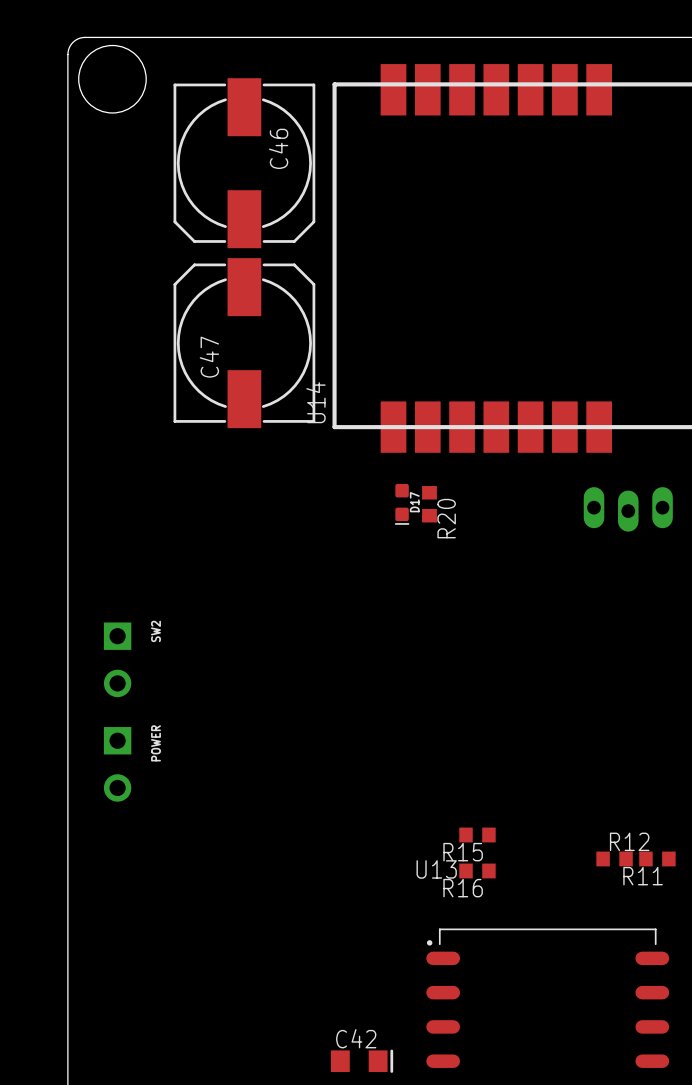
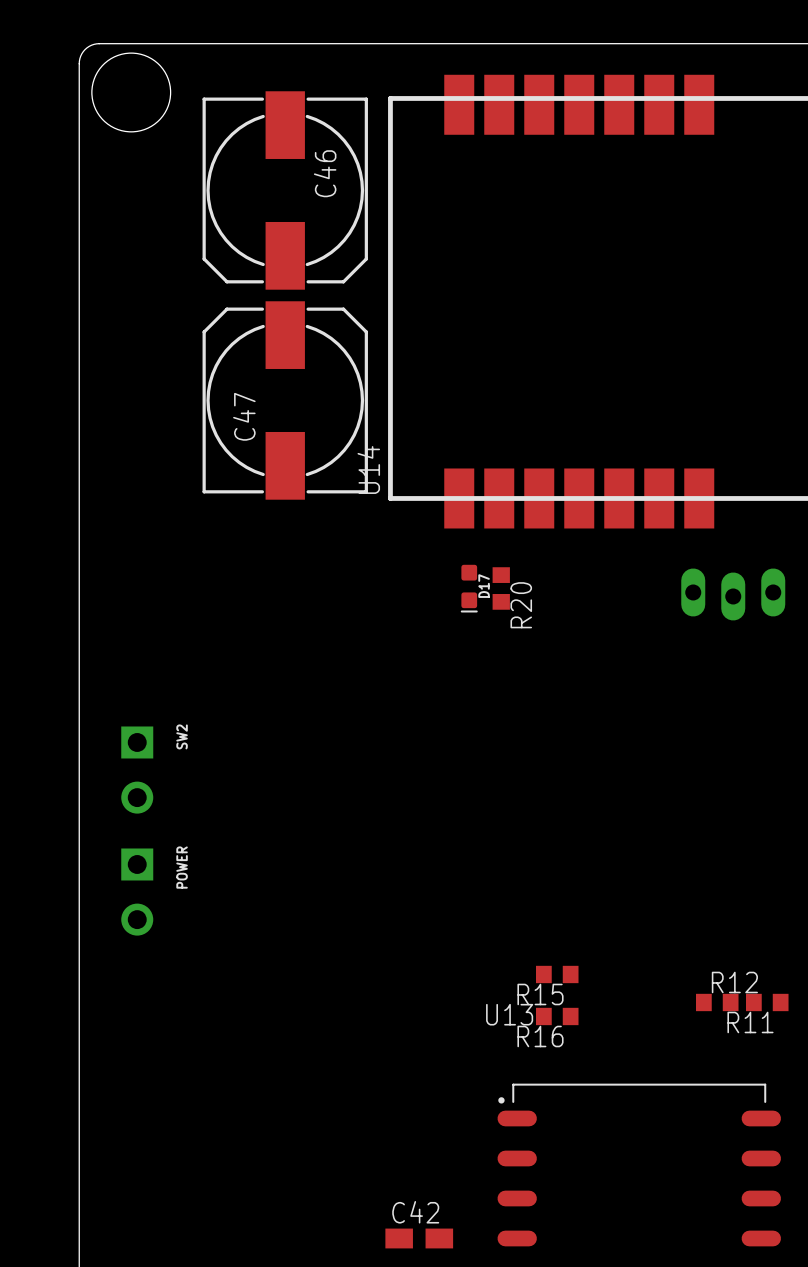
C42 footprint: [330, 1049, 394, 1073] -> [385, 1228, 454, 1249]

